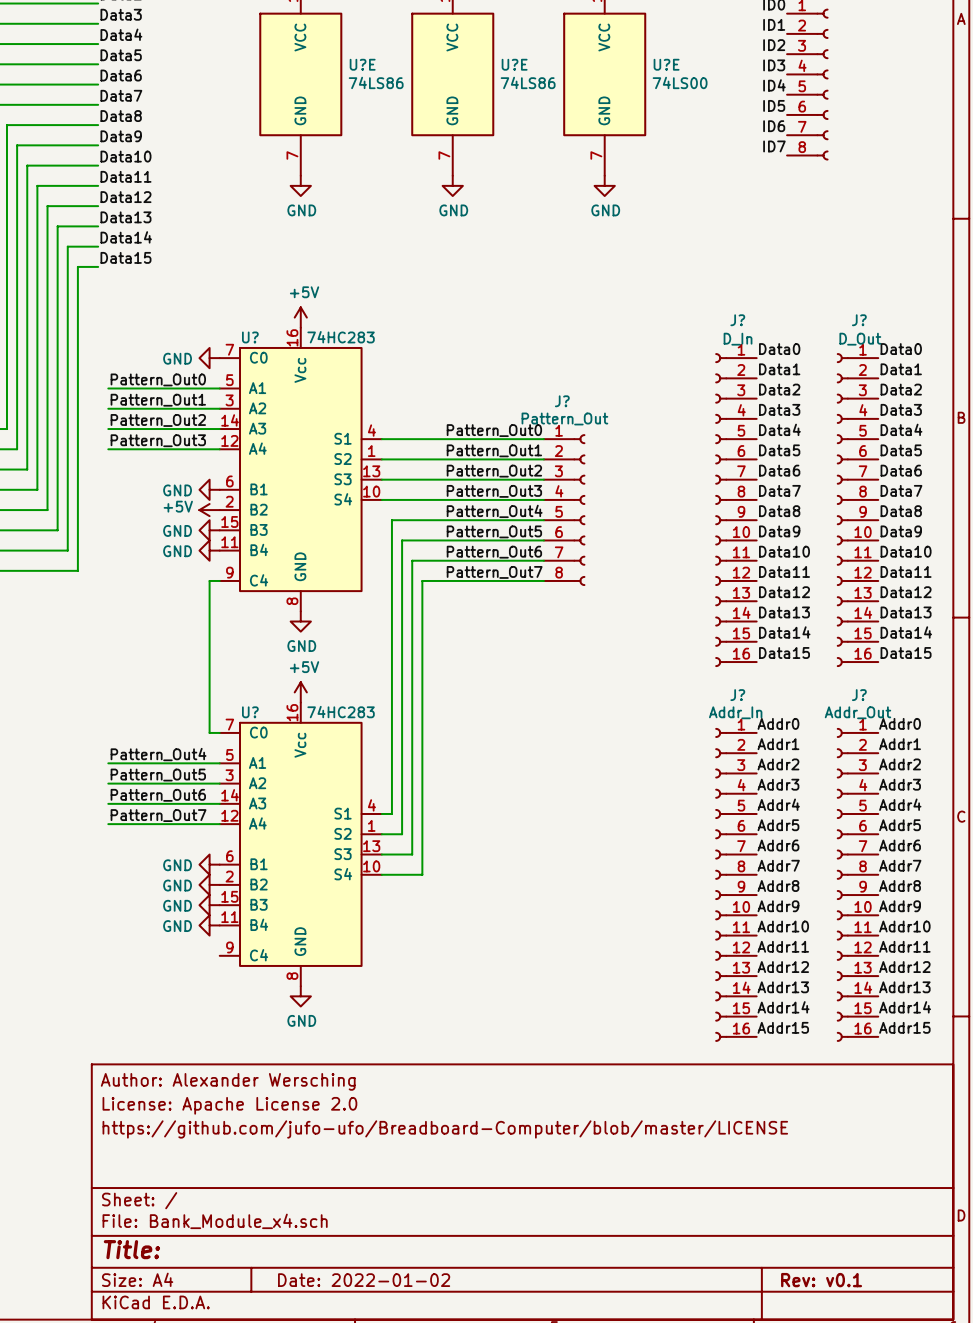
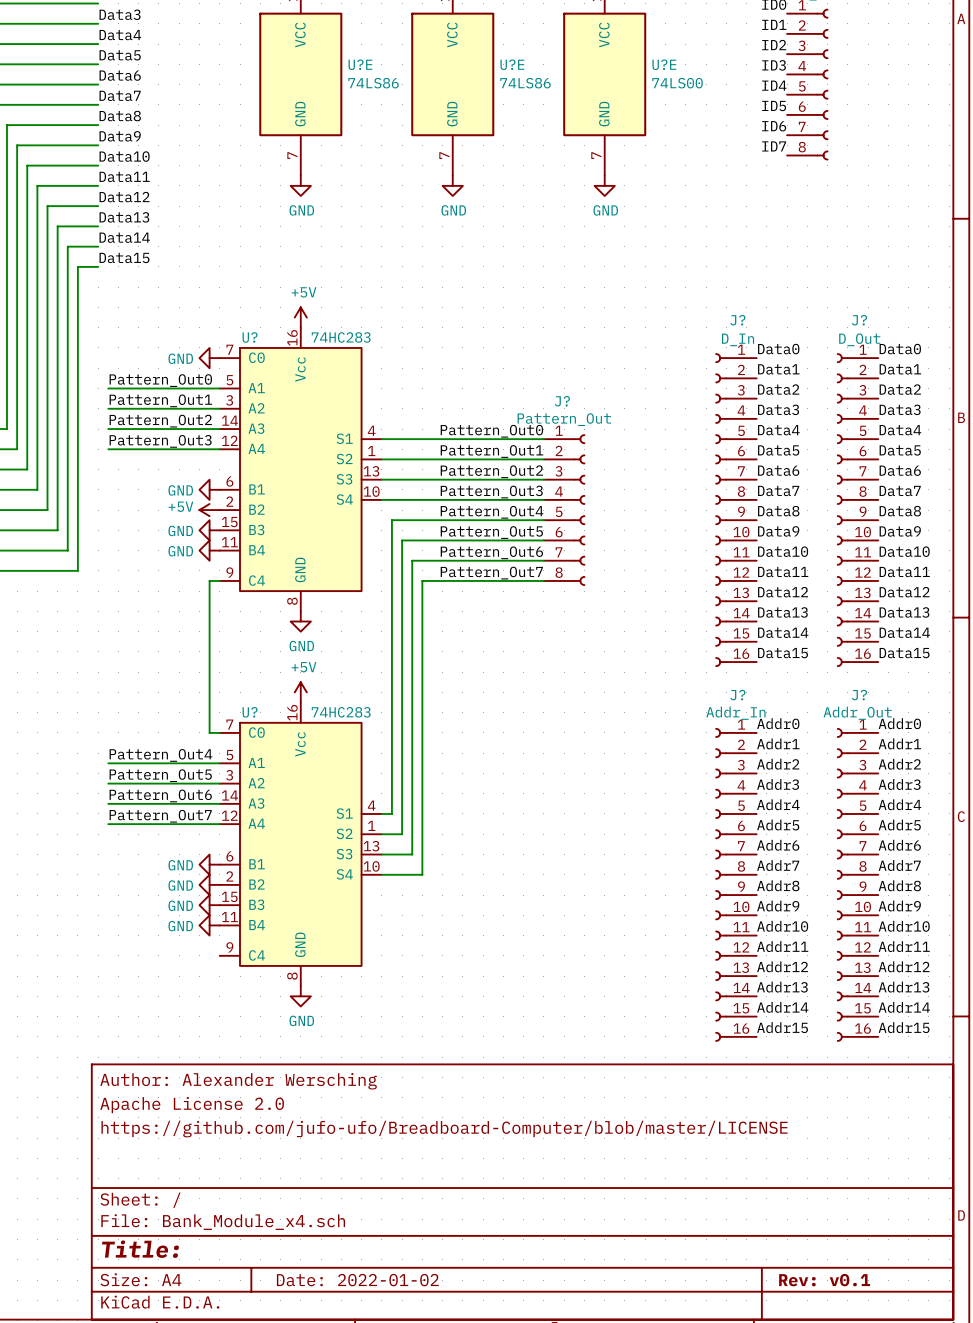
title block: License: Apache License 2.0 (229, 1105) -> Apache License 2.0 (192, 1105)

